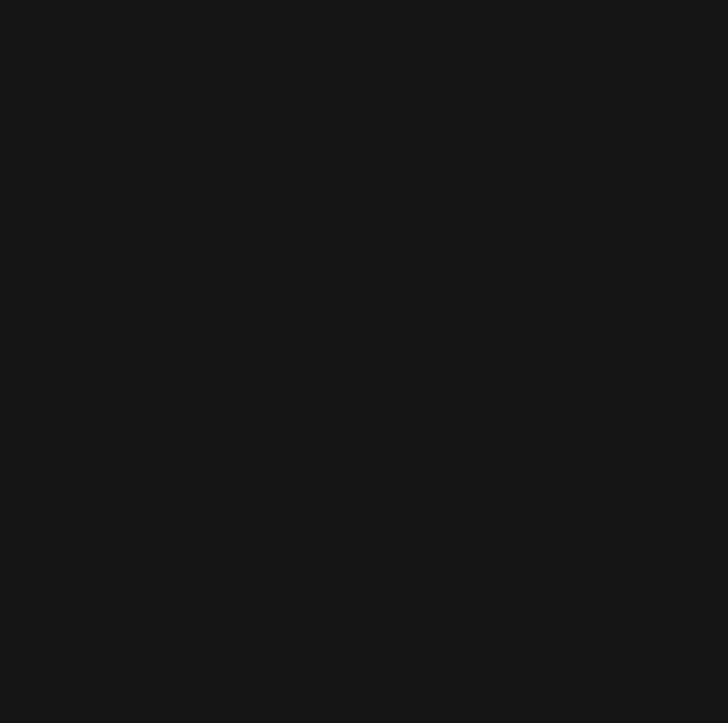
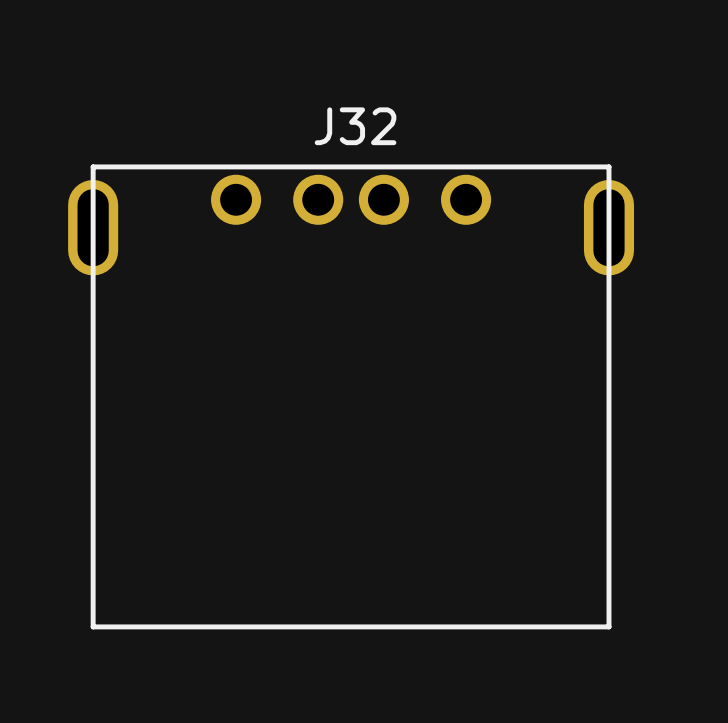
J32: none -> (351, 396)

